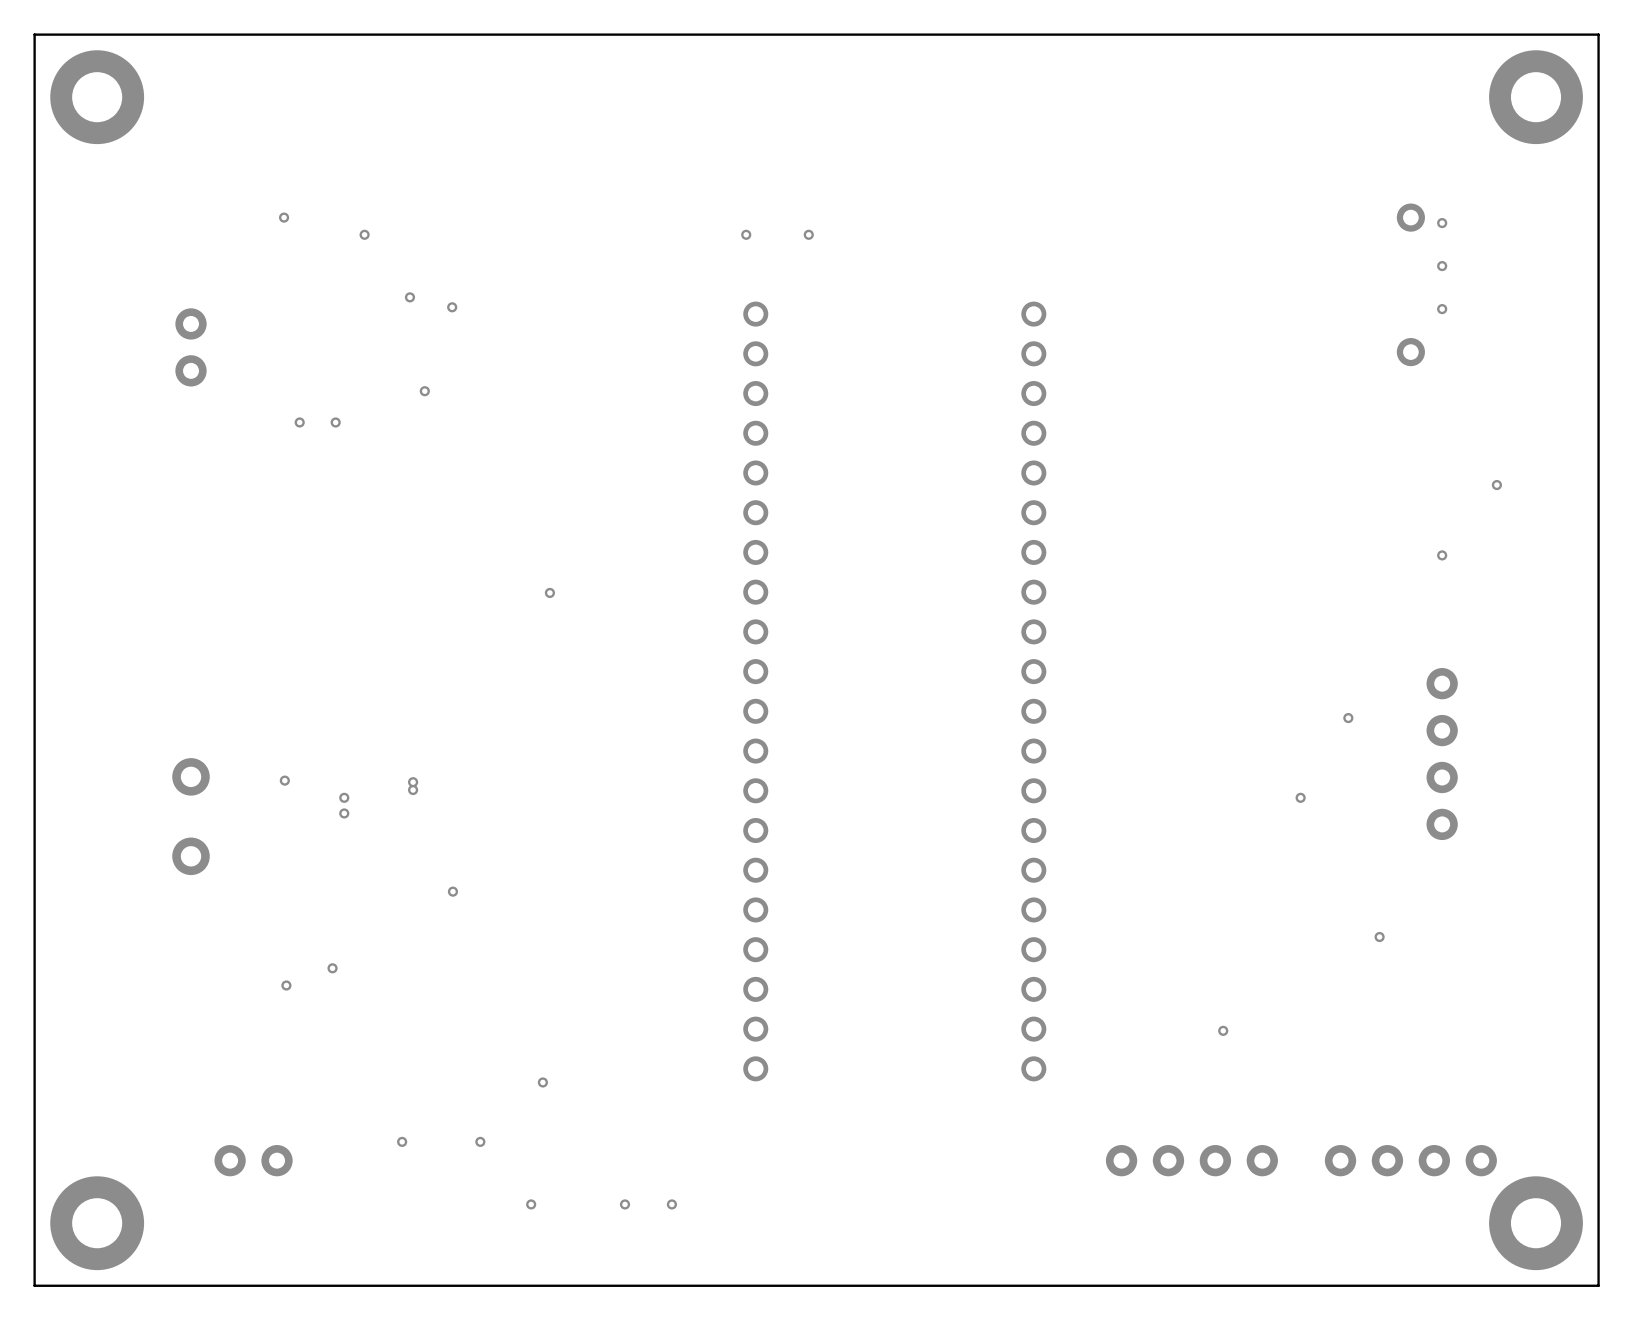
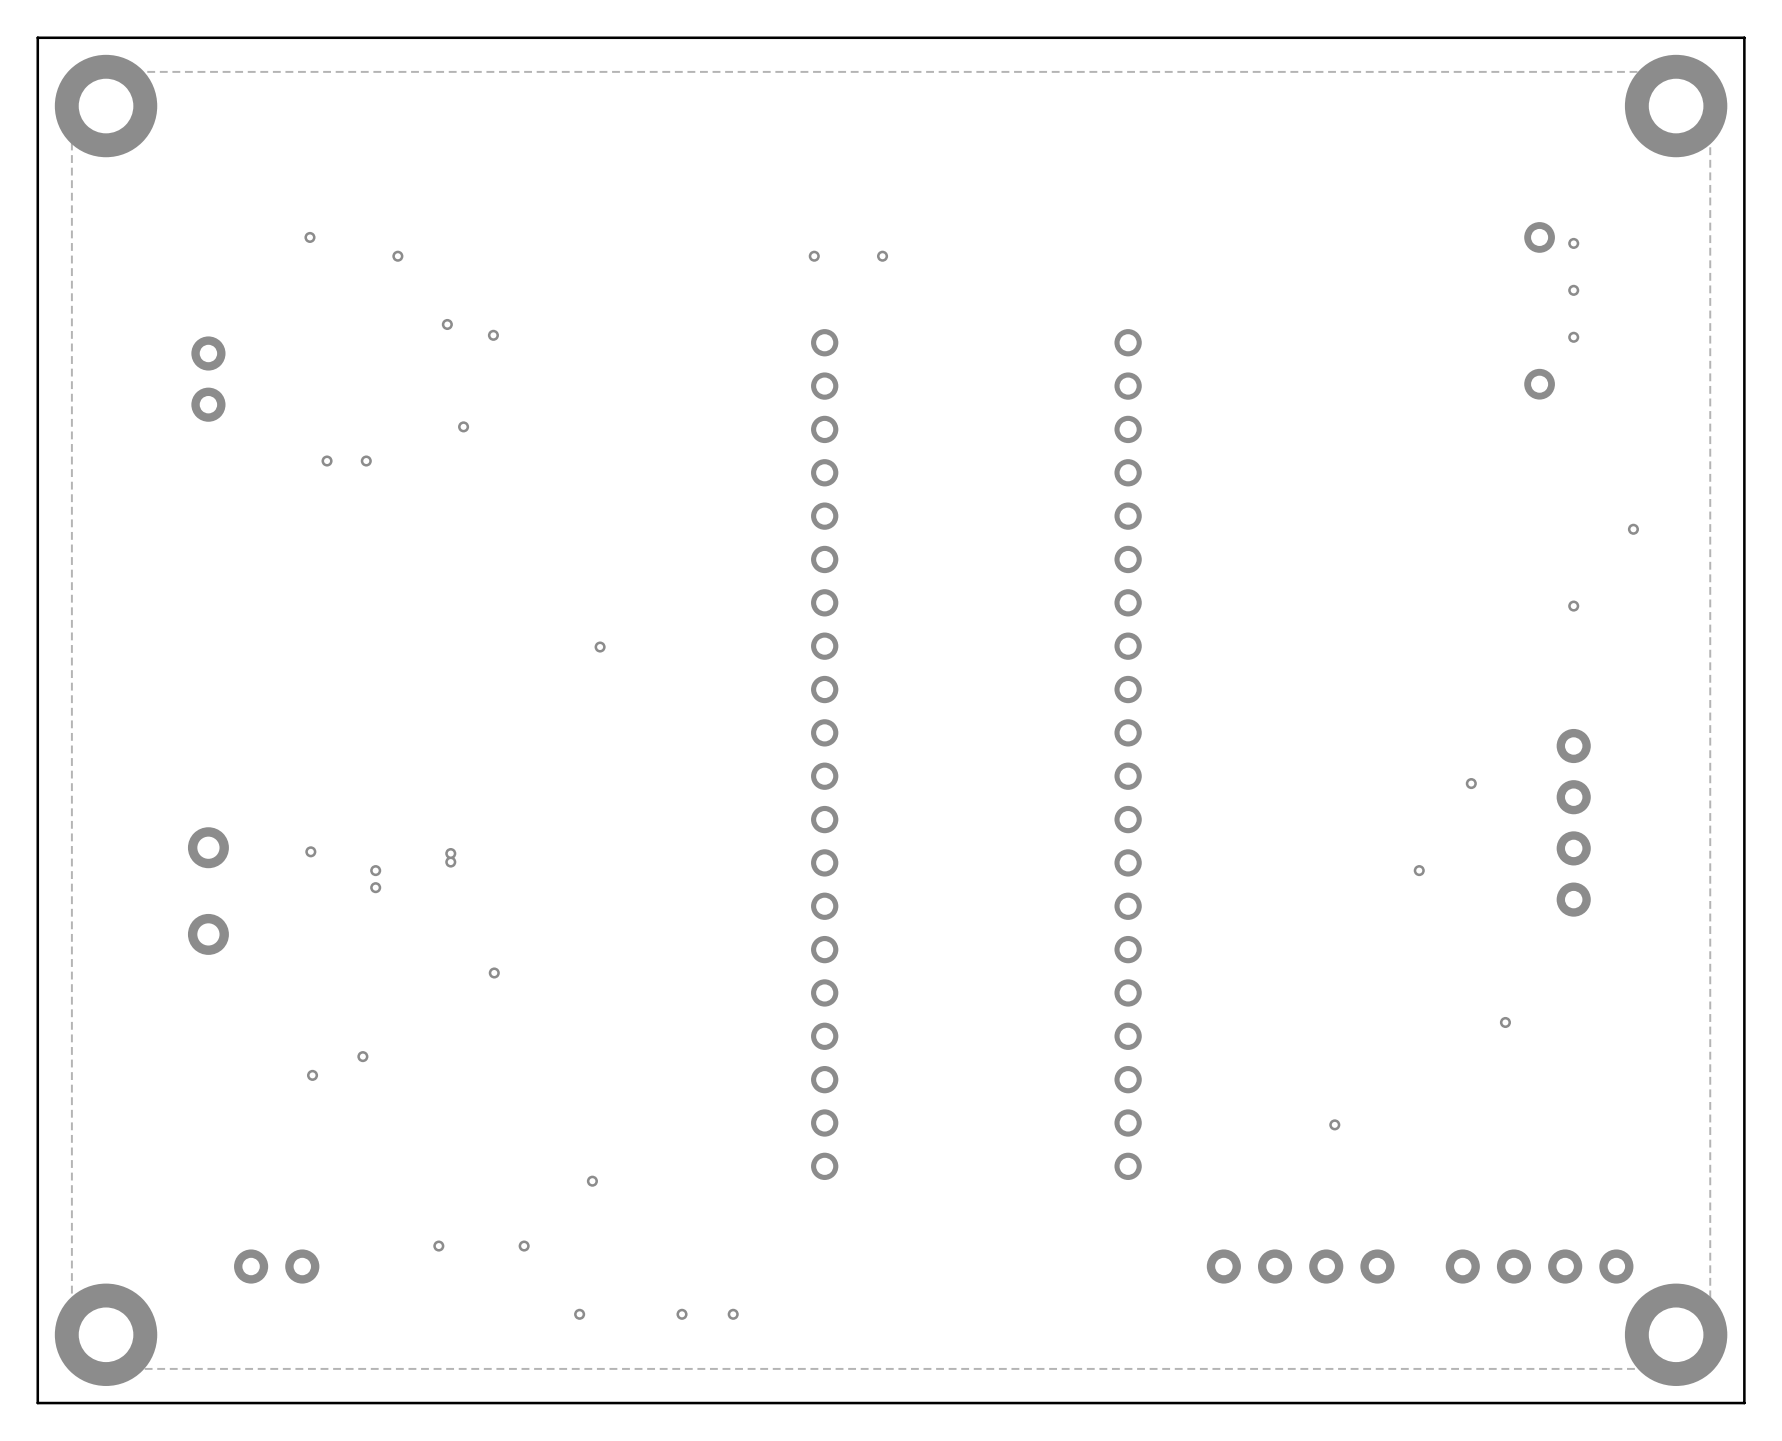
zone outline: none -> (71, 71) (1710, 71) (1710, 1368) (71, 1368) (71, 71)

